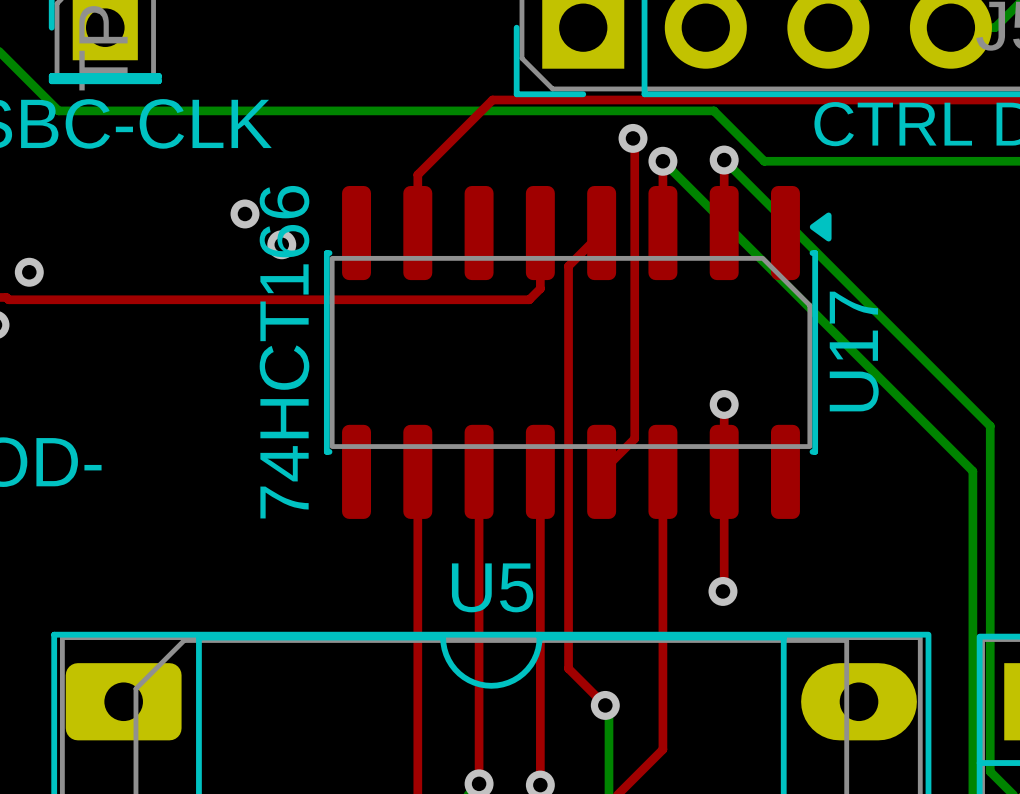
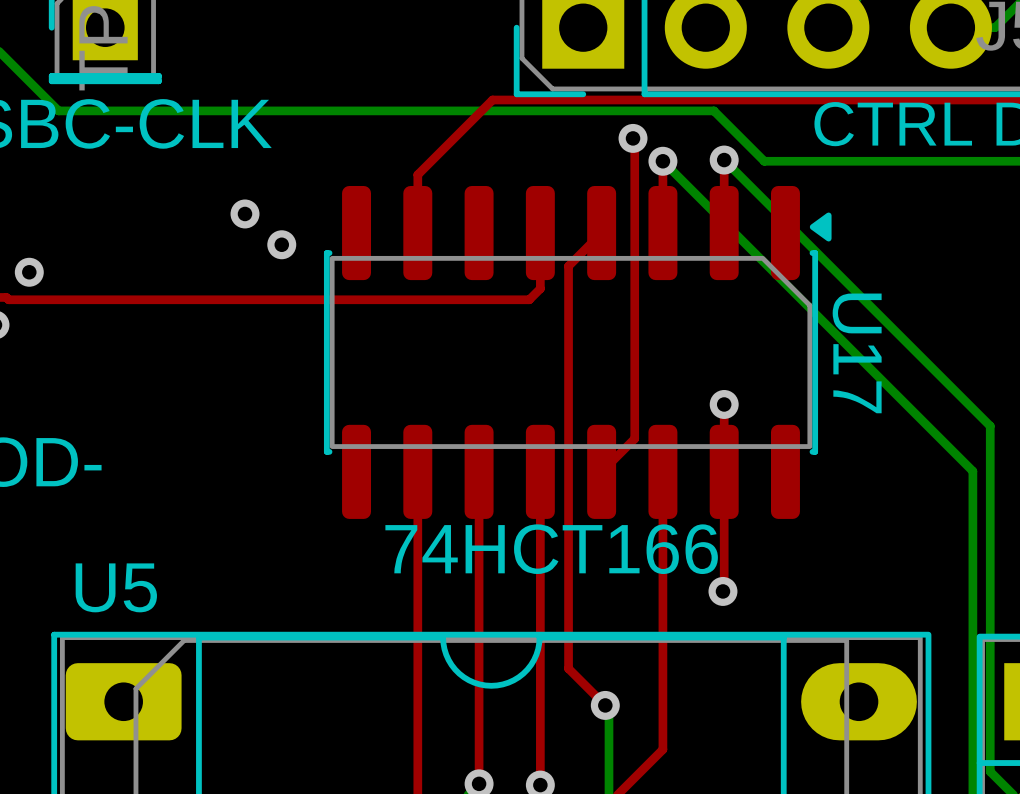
U17 name rotation: 0° (854, 351) -> 180° (857, 353)
U17 value rotation: 0° (284, 352) -> 90° clockwise (551, 549)
U5 name position: U5 (492, 587) -> U5 (116, 587)

